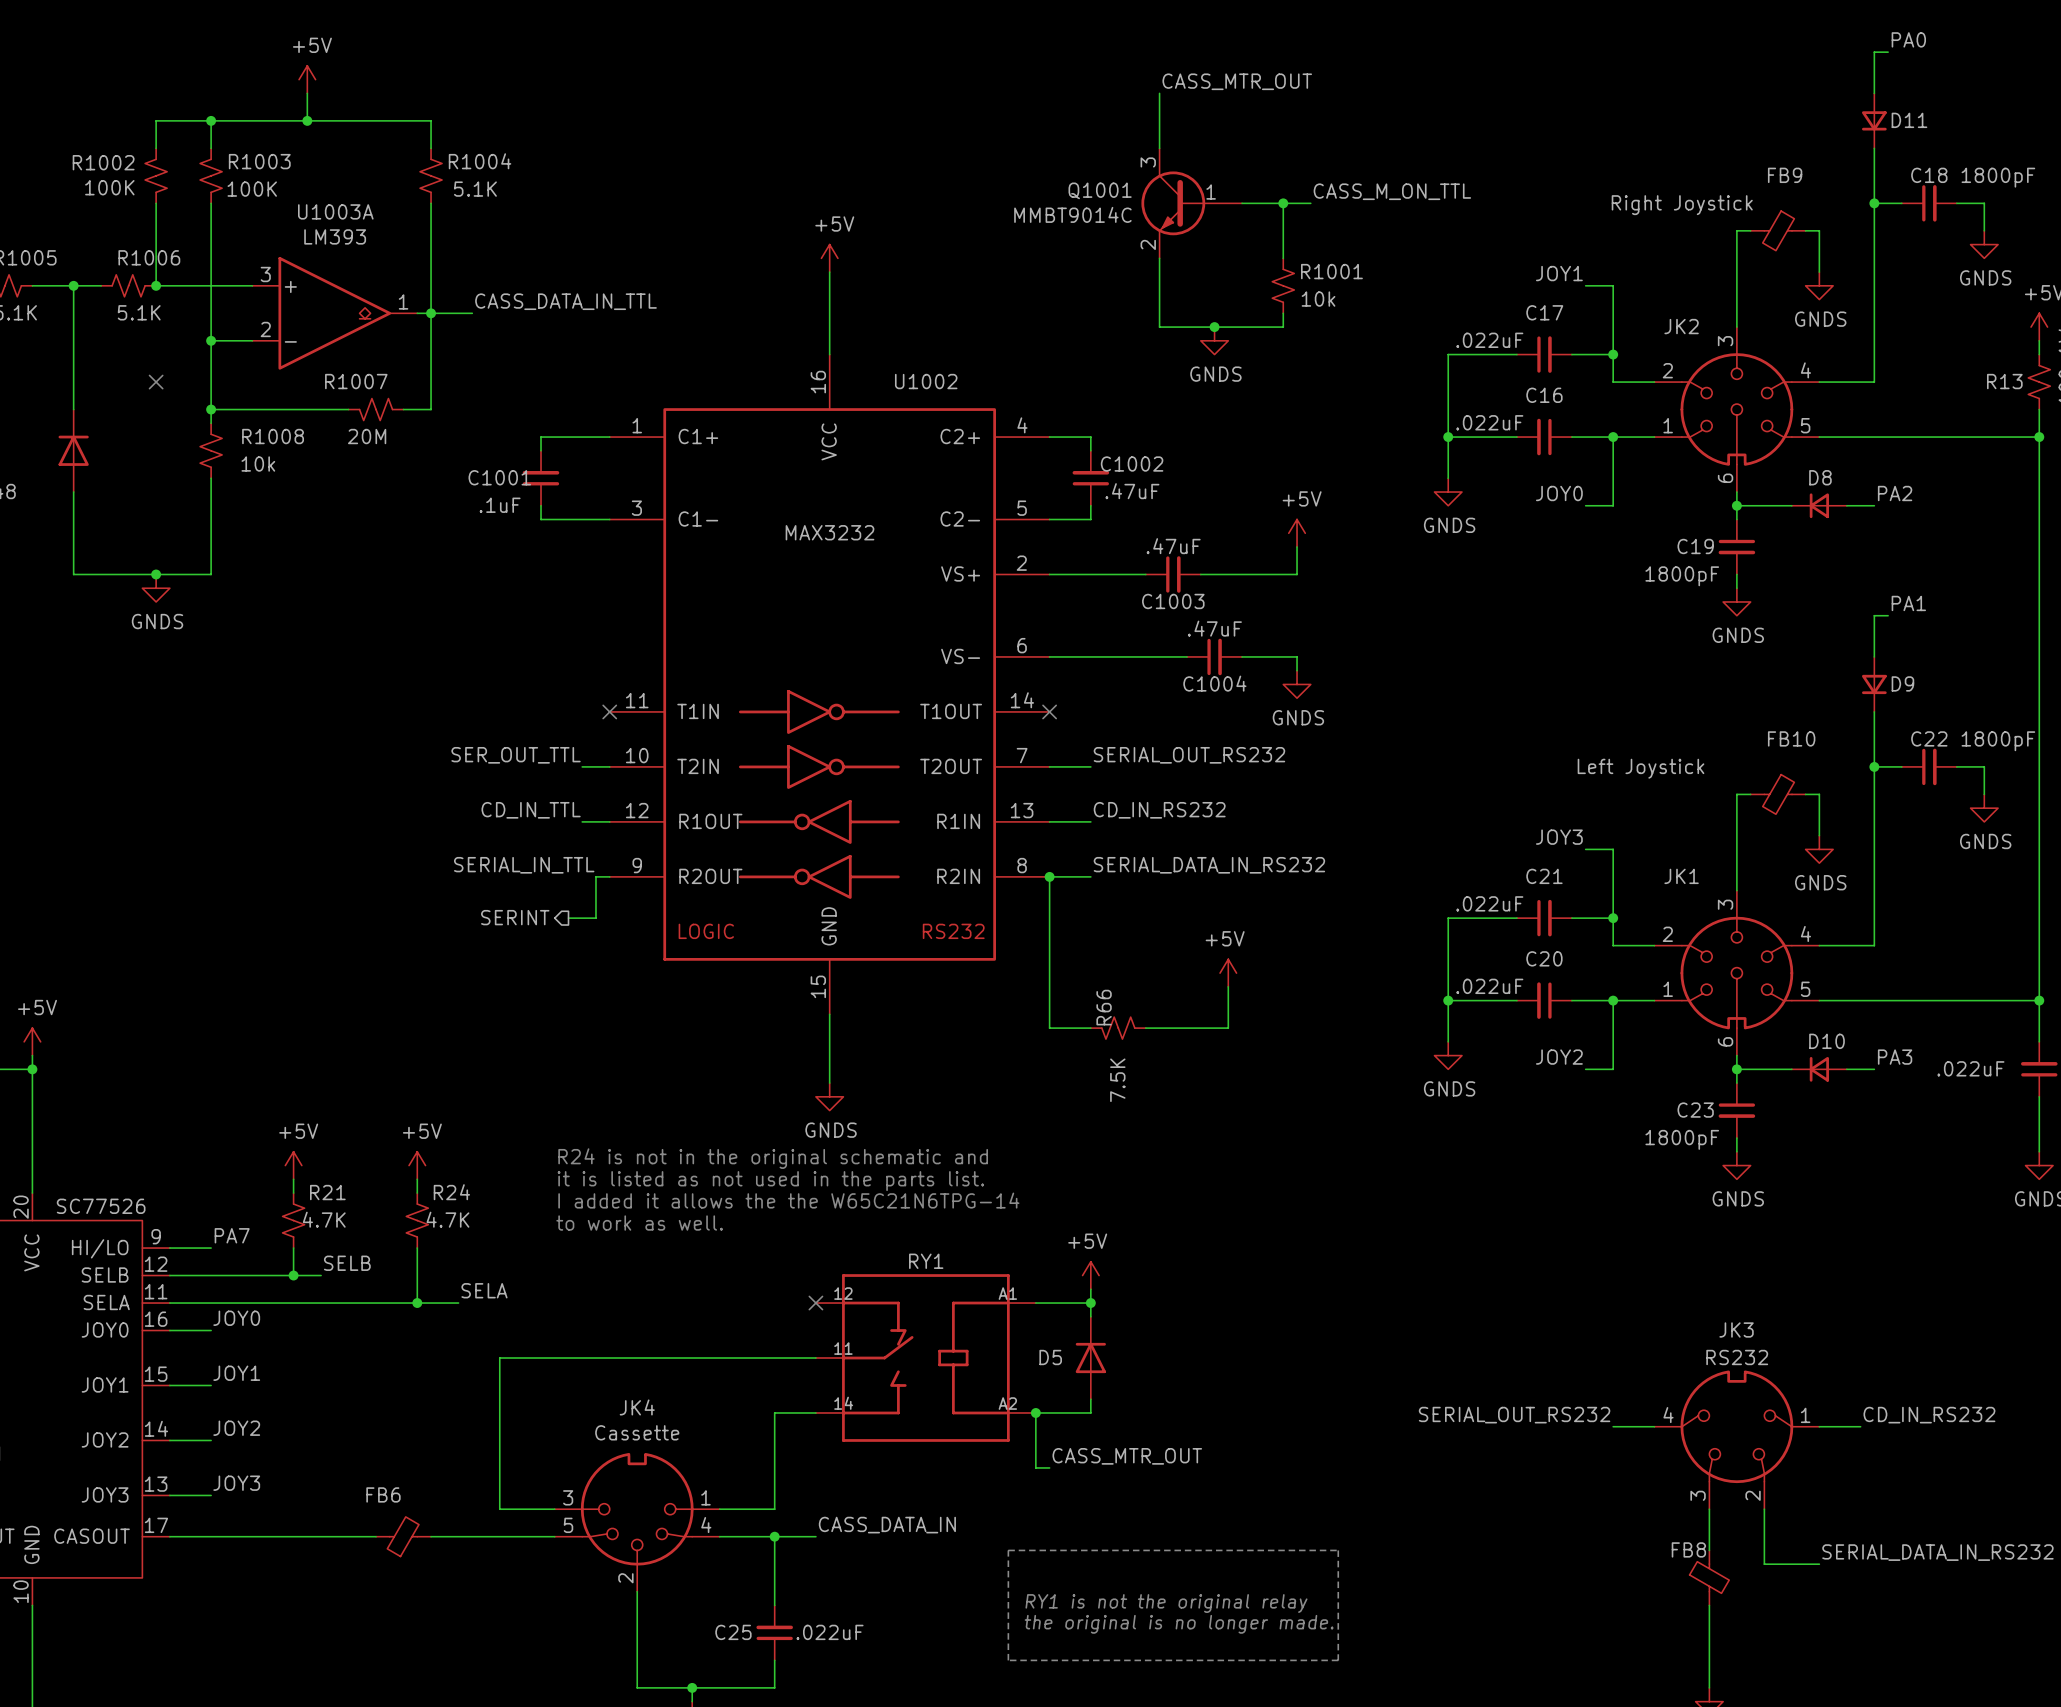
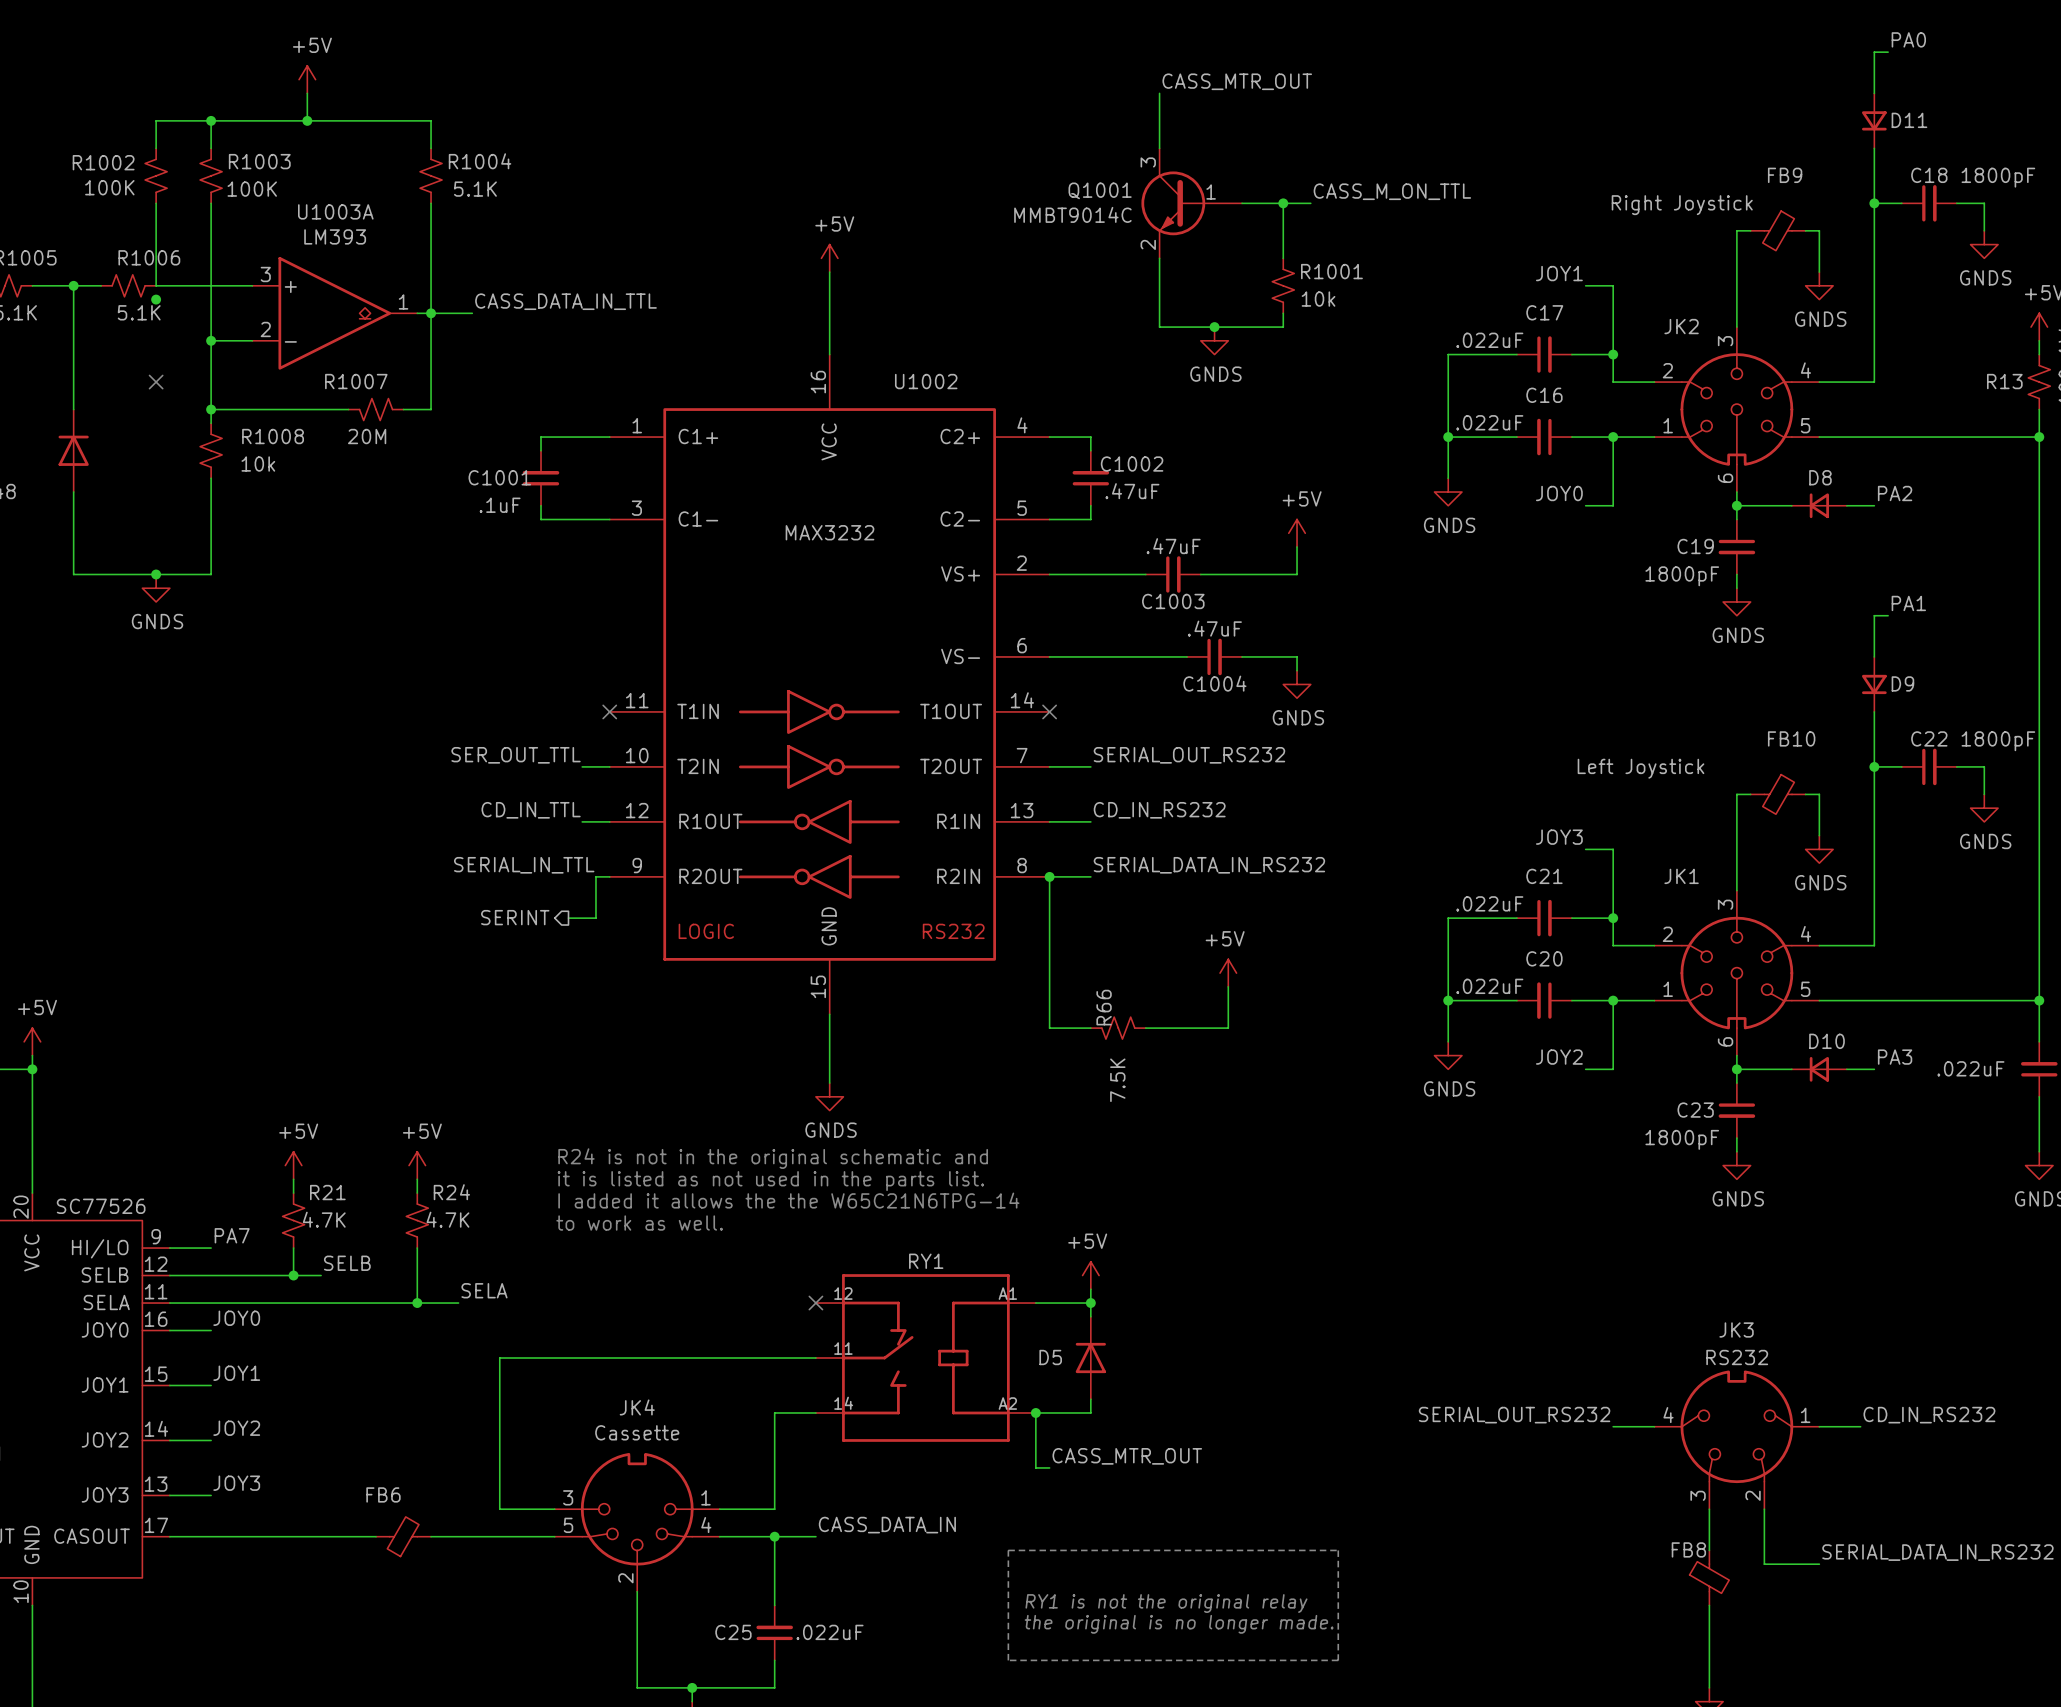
junction position: (156, 285) -> (156, 299)

